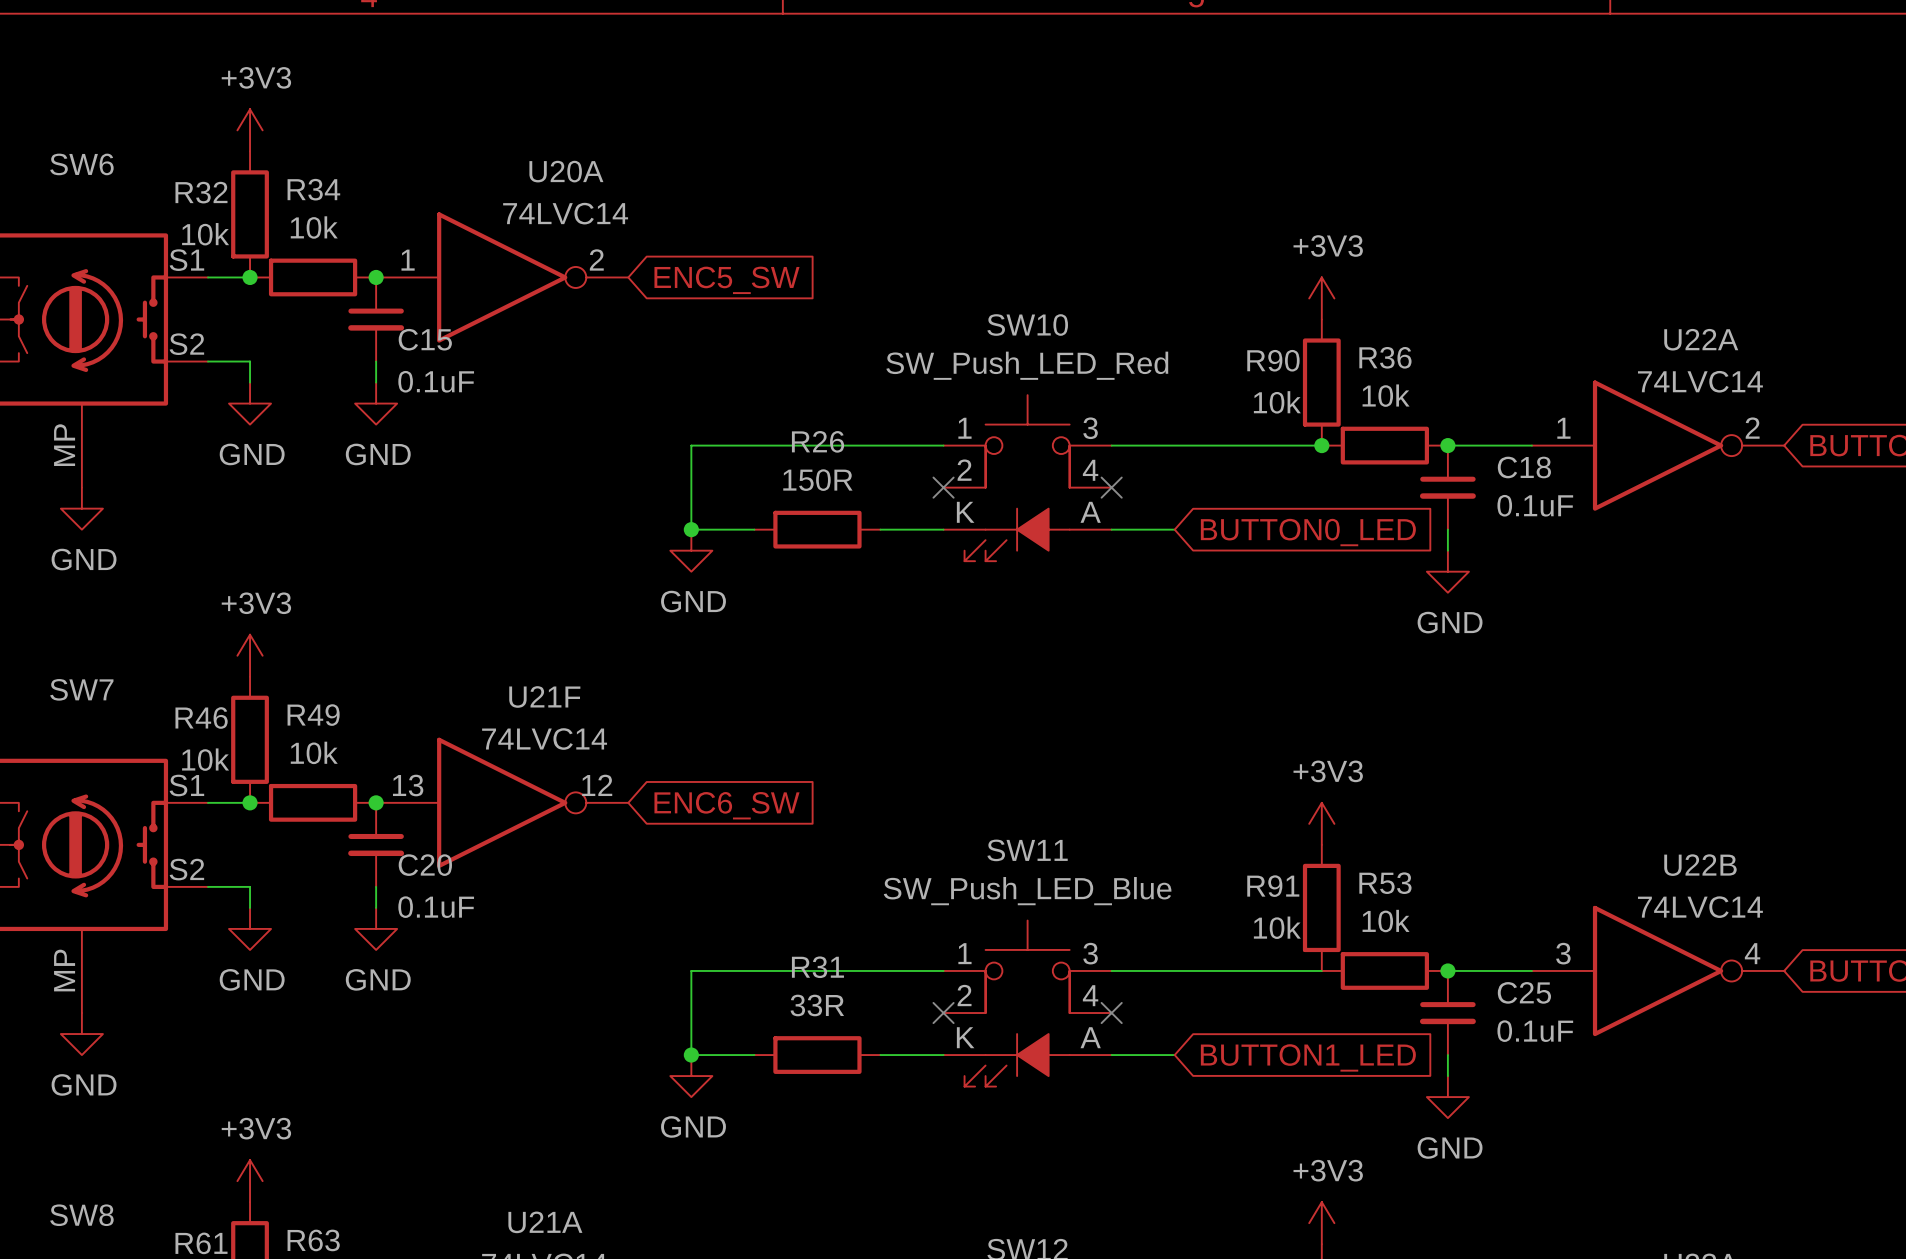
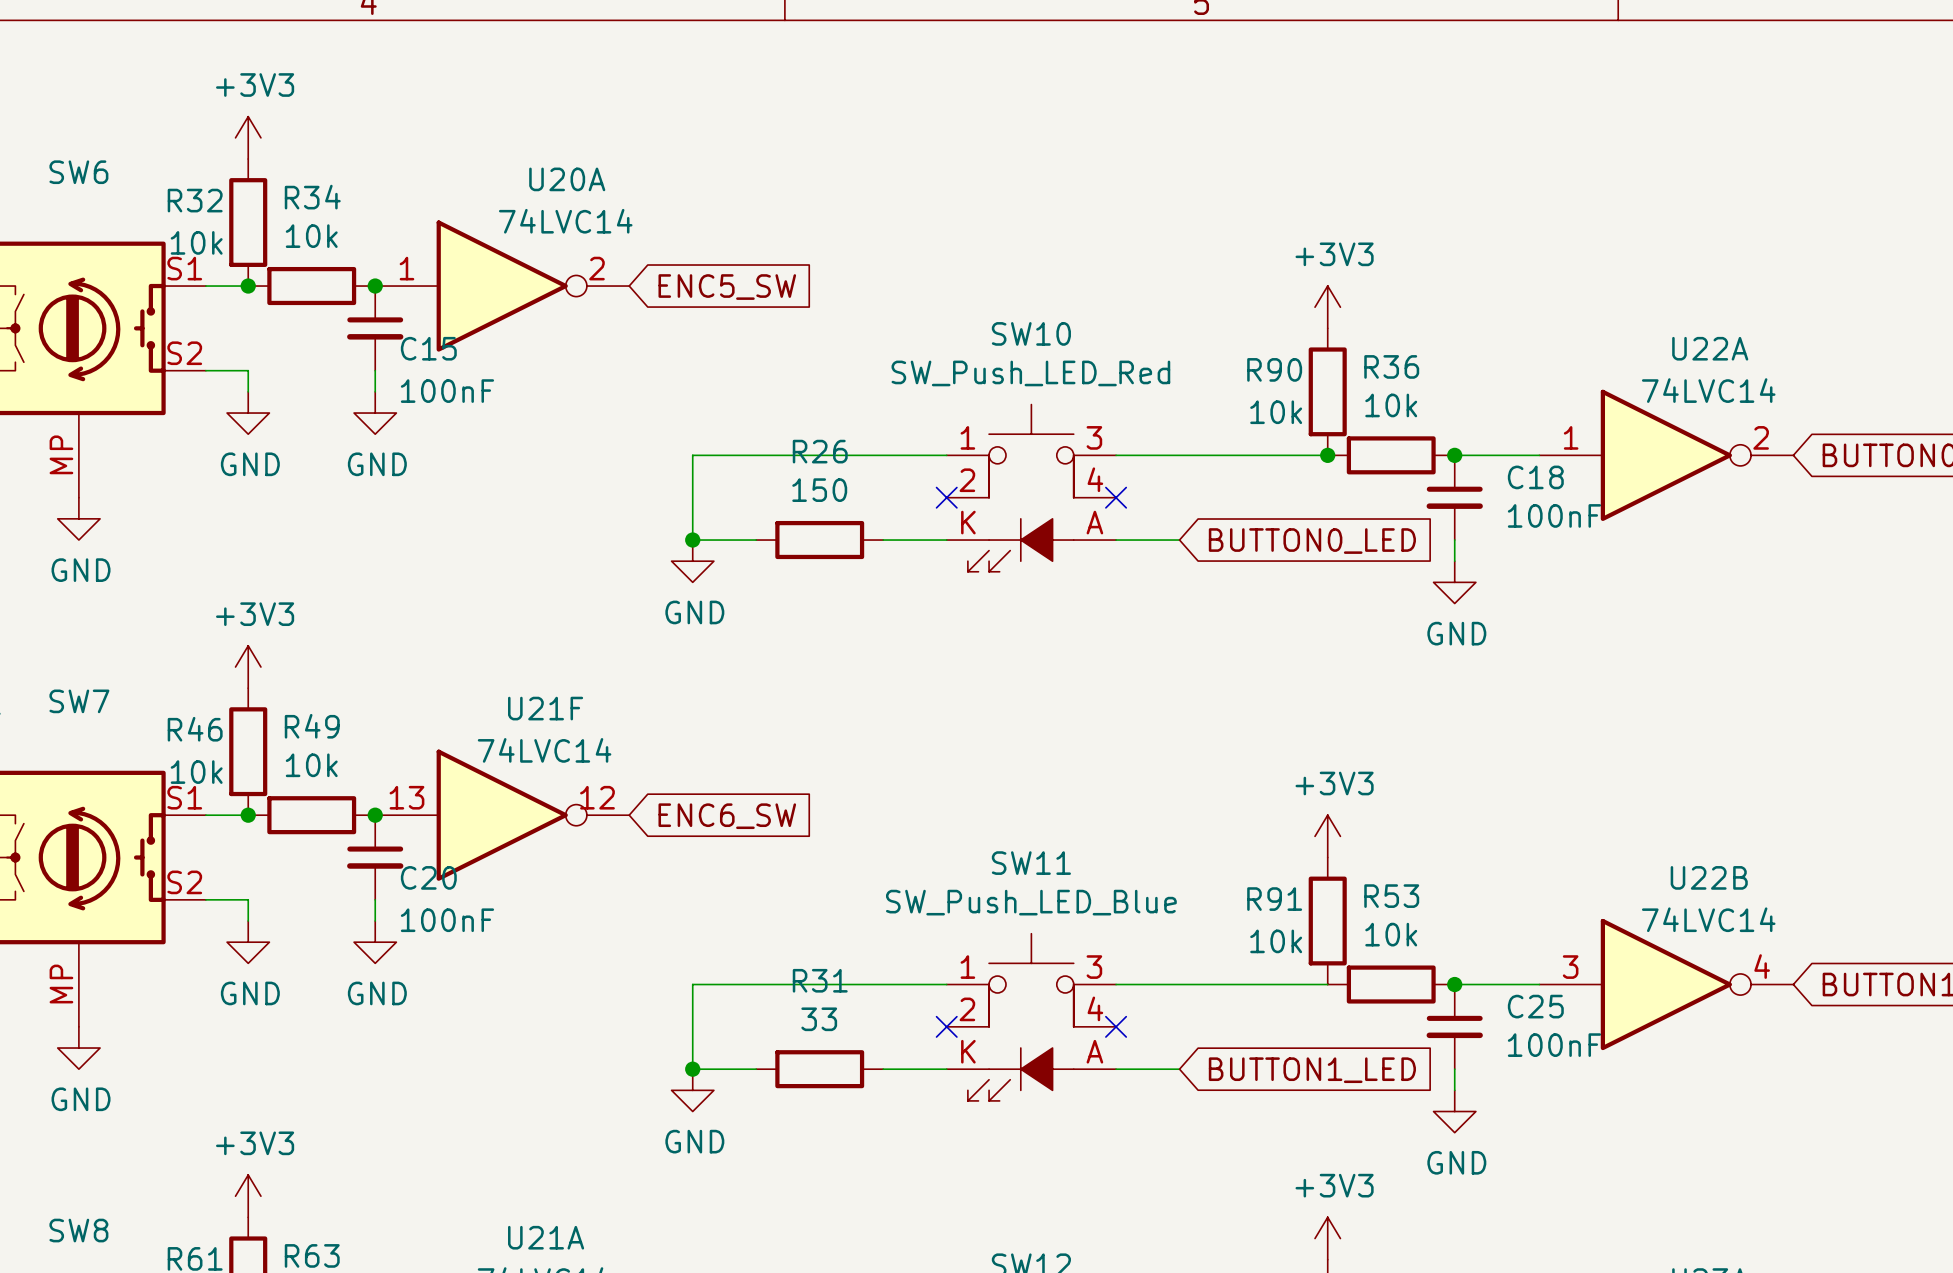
C15 value: 0.1uF (436, 381) -> 100nF (447, 391)
R26 value: 150R (817, 480) -> 150 (819, 490)
C18 value: 0.1uF (1535, 505) -> 100nF (1554, 515)
C20 value: 0.1uF (436, 907) -> 100nF (447, 920)
R31 value: 33R (817, 1005) -> 33 (819, 1019)
C25 value: 0.1uF (1535, 1031) -> 100nF (1554, 1045)

